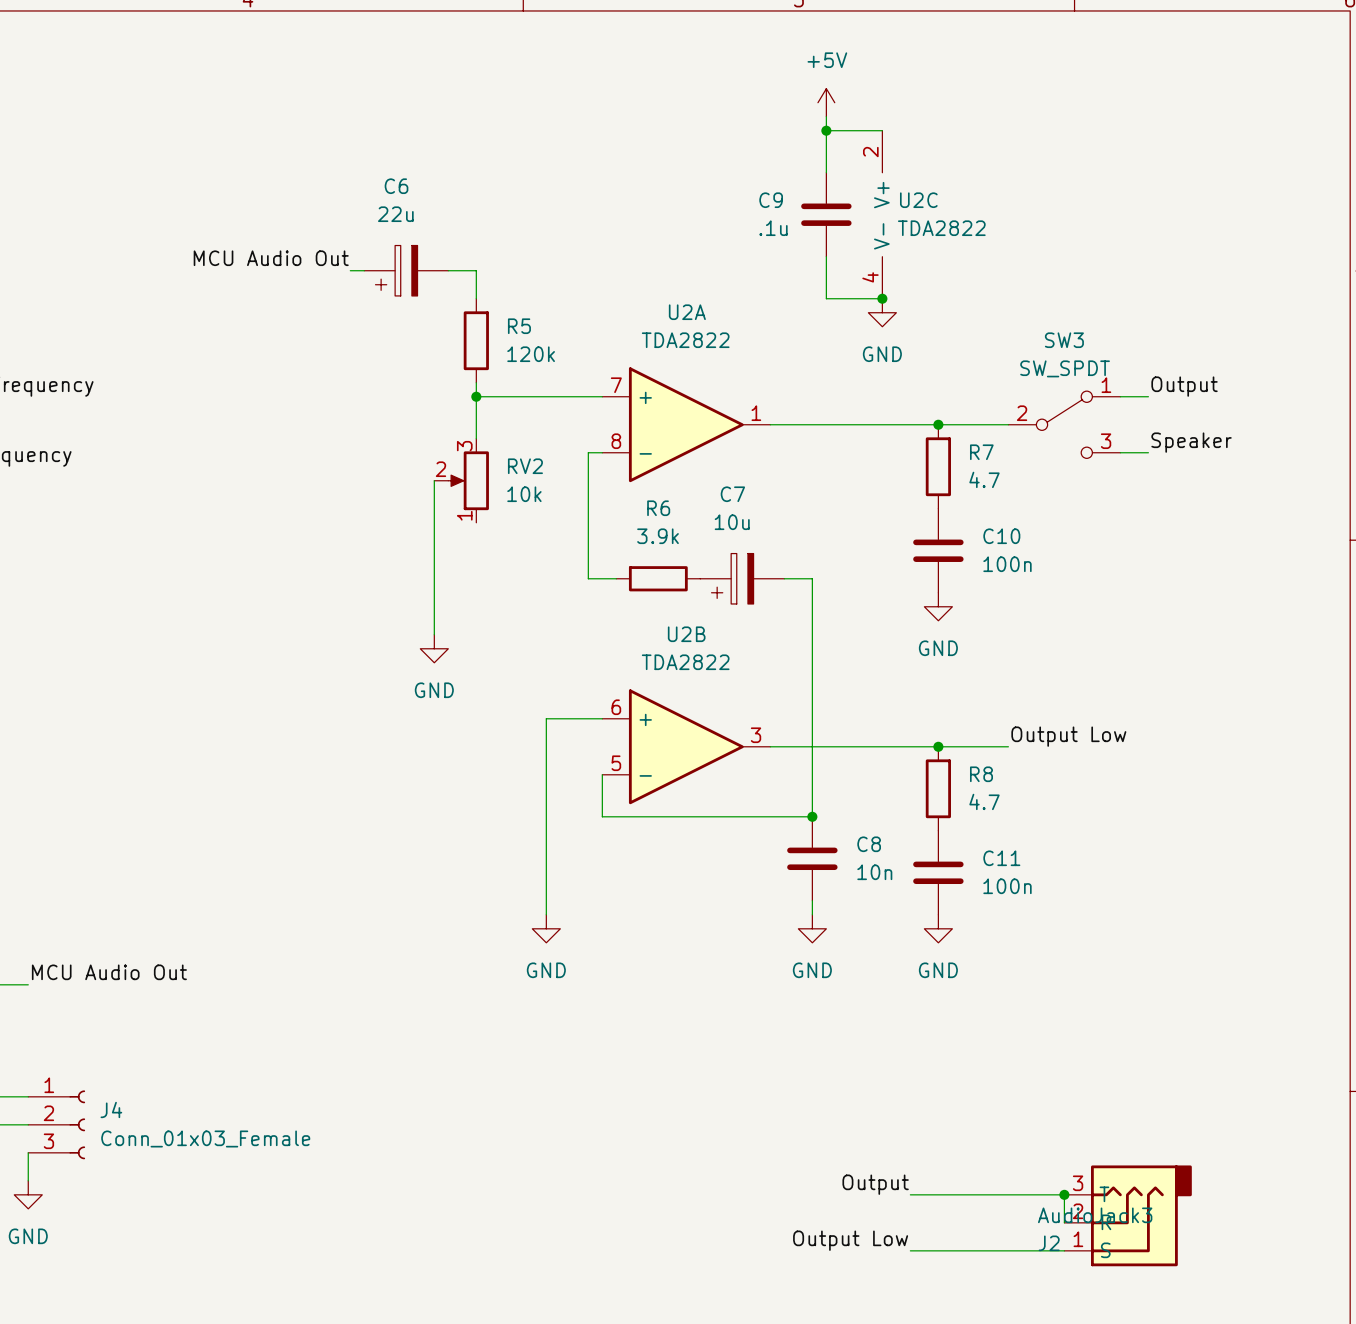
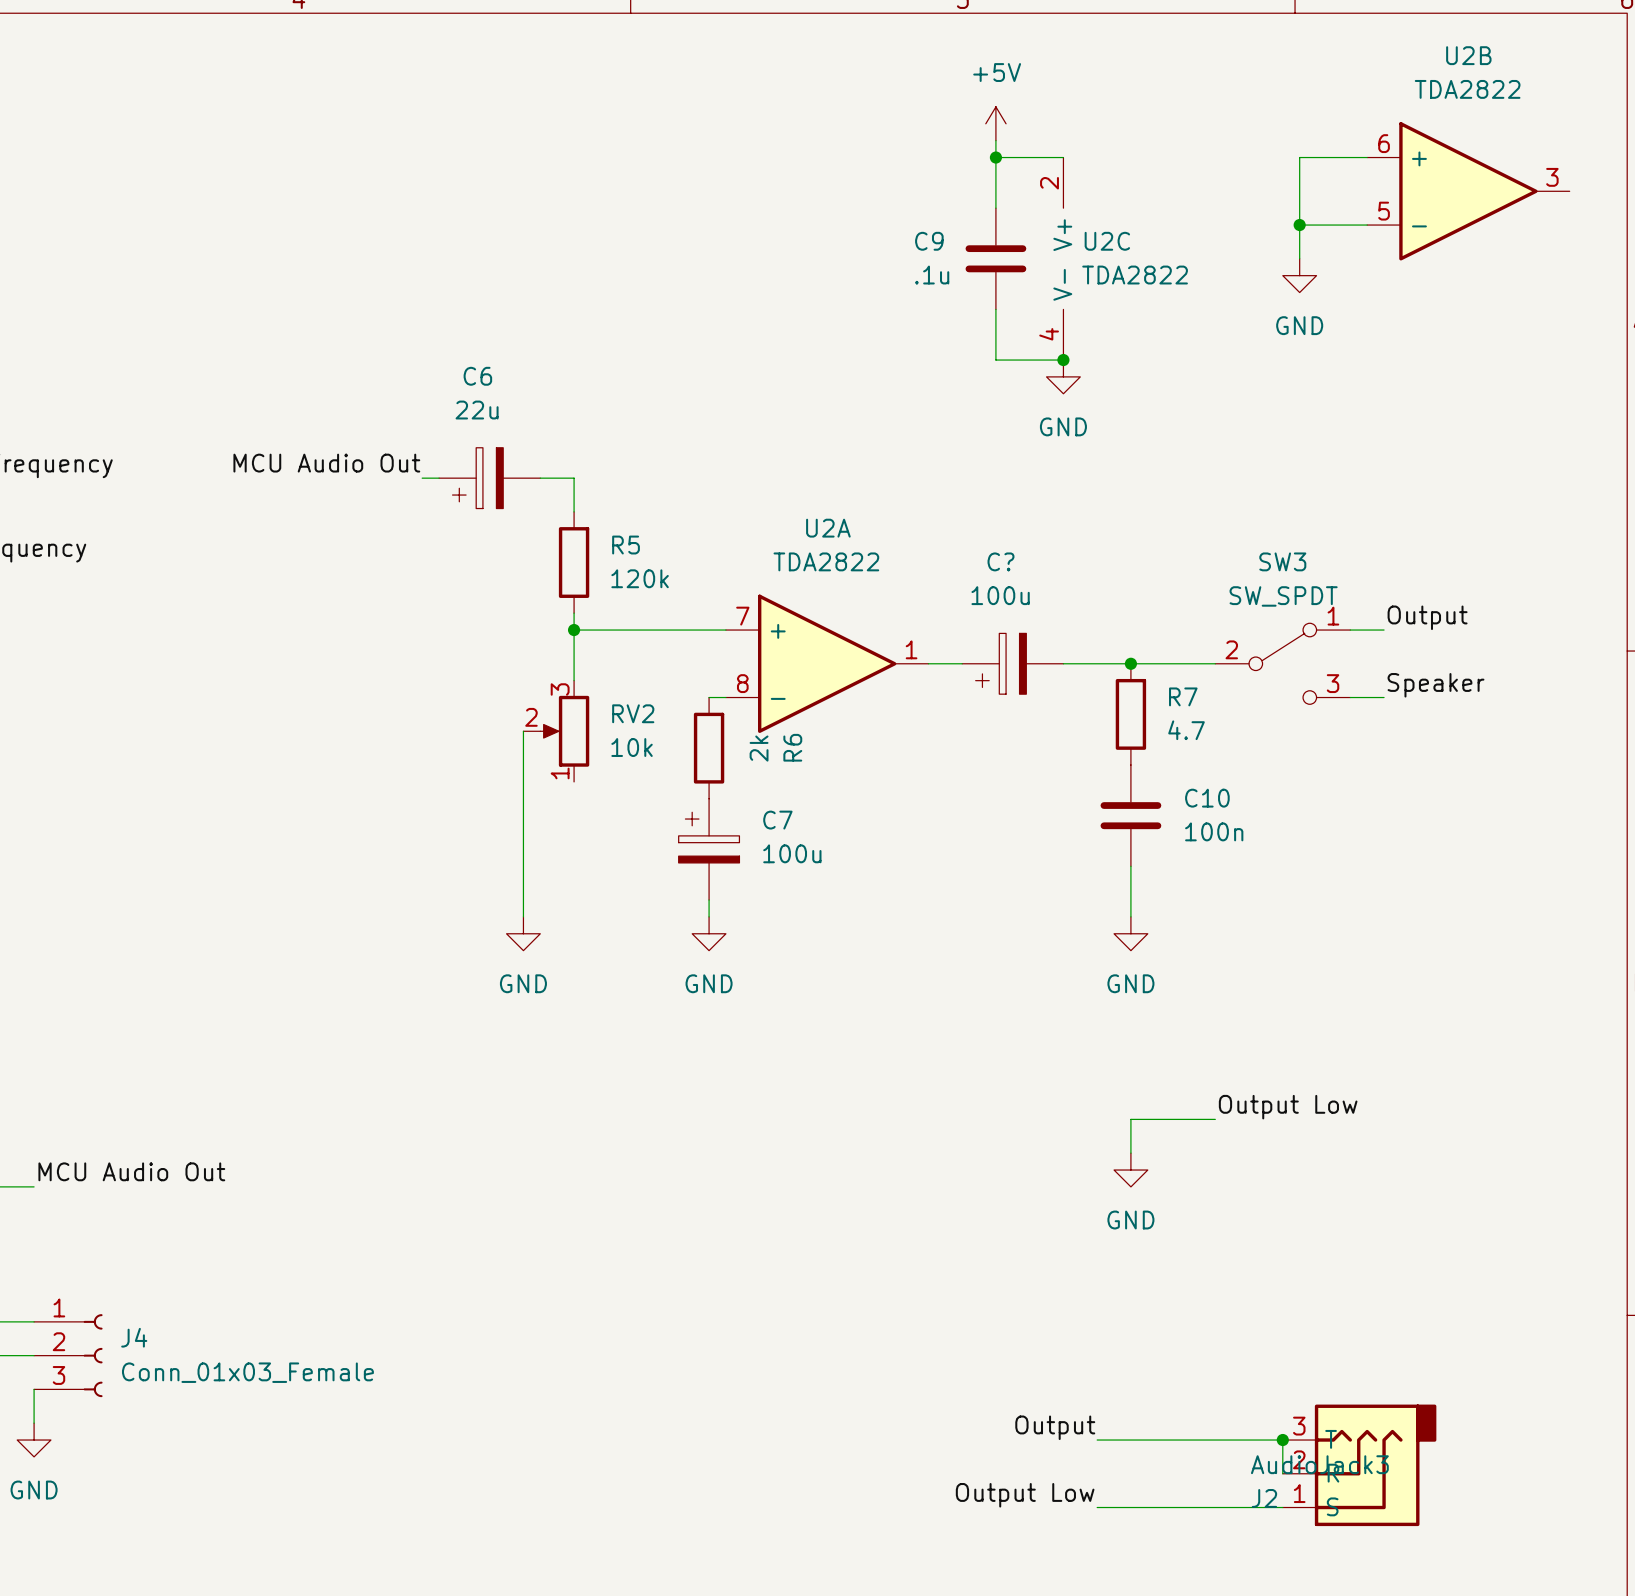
wire: none -> (1367, 157) (1299, 157) (1299, 258)
wire: none -> (1299, 225) (1367, 225)
junction: none -> (1299, 225)
power symbol: none -> GND (1299, 275)
label position: MCU Audio Out (271, 258) -> MCU Audio Out (326, 463)
wire: (350, 270) (364, 270) -> (422, 478) (439, 478)
C6 position: (406, 270) -> (489, 478)
wire: (448, 270) (476, 270) (476, 298) -> none
R5 position: (476, 340) -> (574, 562)
wire: (476, 382) (476, 396) (602, 396) -> none
label position: Output (1184, 386) -> Output (1427, 617)
wire: none -> (540, 478) (574, 478)
junction: (476, 396) -> none
wire: (1120, 396) (1148, 396) -> (1350, 630) (1384, 630)
U2A position: (686, 424) -> (827, 663)
wire: (770, 424) (1008, 424) -> none
junction: (938, 424) -> none
SW3 position: (1064, 424) -> (1282, 663)
label position: Speaker (1191, 442) -> Speaker (1436, 685)
wire: (602, 452) (588, 452) (588, 578) -> none
wire: (1120, 452) (1148, 452) -> (1350, 697) (1384, 697)
R7 position: (938, 466) -> (1130, 714)
wire: (434, 480) (434, 606) -> (523, 765) (523, 916)
RV2 position: (461, 480) -> (556, 731)
C7 name position: C7 (732, 494) -> C7 (777, 820)
wire: none -> (574, 613) (574, 680)
wire: none -> (574, 630) (725, 630)
junction: none -> (574, 630)
C7 value: 10u (732, 522) -> 100u (792, 853)
R6 value: 3.9k (658, 536) -> 2k (759, 748)
wire: none -> (928, 663) (962, 663)
C?: none -> 100u (1012, 663)
wire: none -> (1063, 663) (1215, 663)
junction: none -> (1130, 663)
C10 position: (938, 550) -> (1130, 815)
R6 rotation: 0° (658, 578) -> 90° clockwise (709, 748)
R6 position: (658, 578) -> (709, 748)
C7 rotation: 0° (732, 578) -> 90° clockwise (709, 837)
C7 position: (742, 578) -> (709, 849)
wire: (784, 578) (812, 578) (812, 816) (602, 816) (602, 774) -> none
power symbol: GND (938, 606) -> none
power symbol: GND (434, 648) -> none
wire: (602, 718) (546, 718) (546, 914) -> none
wire: none -> (1130, 866) (1130, 916)
label position: Output Low (1068, 736) -> Output Low (1288, 1107)
U2B position: (686, 746) -> (1468, 191)
wire: (770, 746) (1008, 746) -> none
junction: (938, 746) -> none
power symbol: none -> GND (523, 933)
power symbol: none -> GND (709, 933)
power symbol: none -> GND (1130, 933)
R8: 4.7 (938, 788) -> none
junction: (812, 816) -> none
C8: 10n (812, 858) -> none
C11: 100n (938, 872) -> none
wire: (812, 900) (812, 914) -> (709, 900) (709, 916)
power symbol: GND (546, 928) -> none
power symbol: GND (812, 928) -> none
power symbol position: GND (938, 928) -> GND (1130, 1170)
wire: none -> (1215, 1119) (1130, 1119) (1130, 1153)

